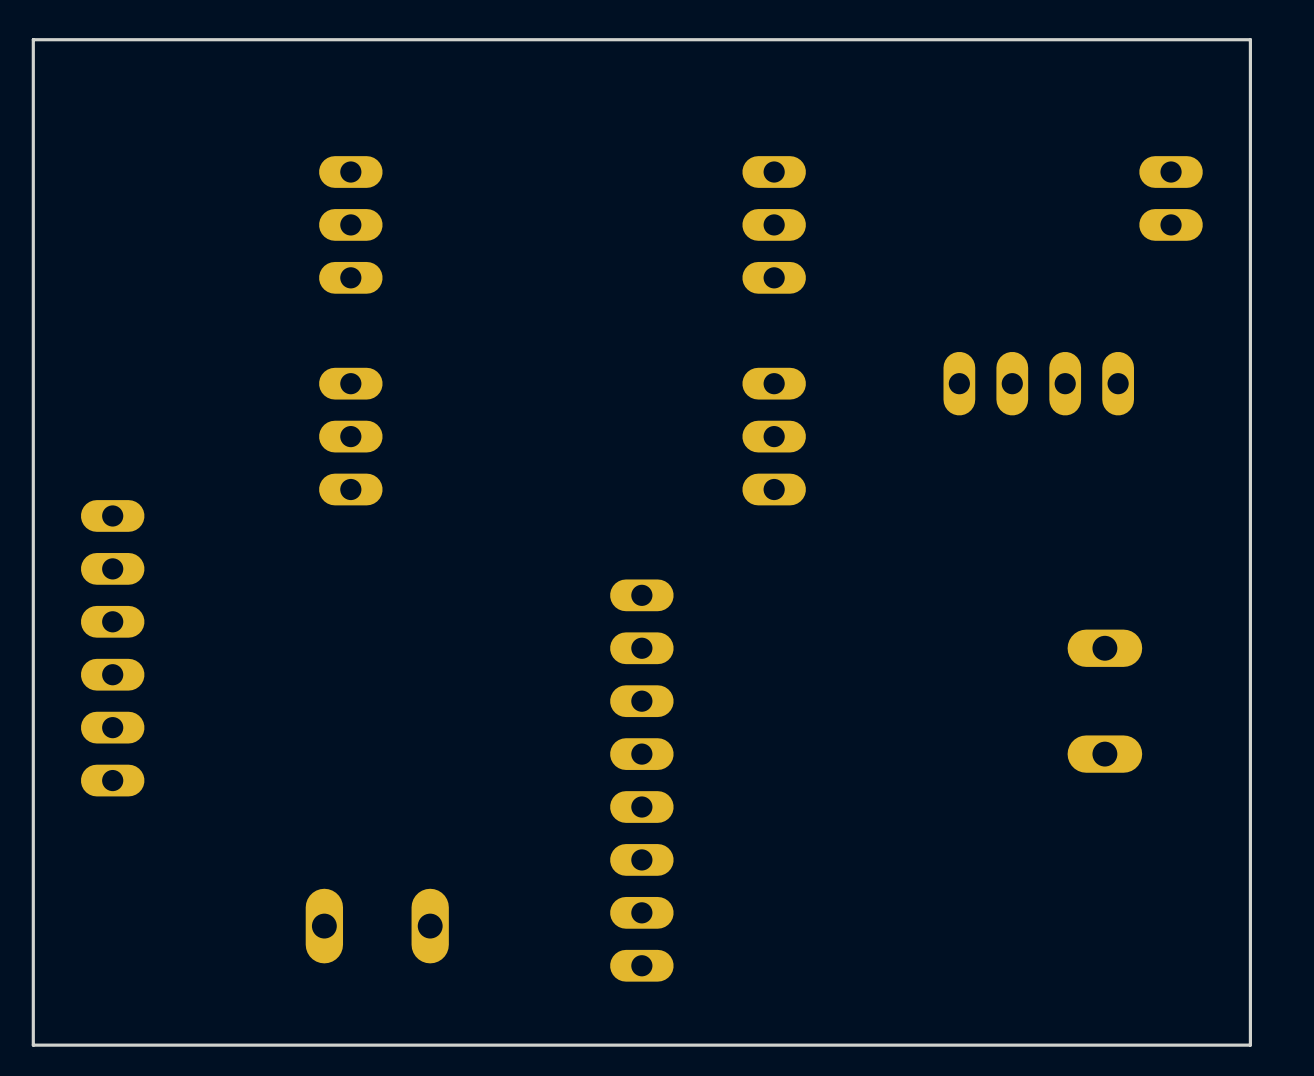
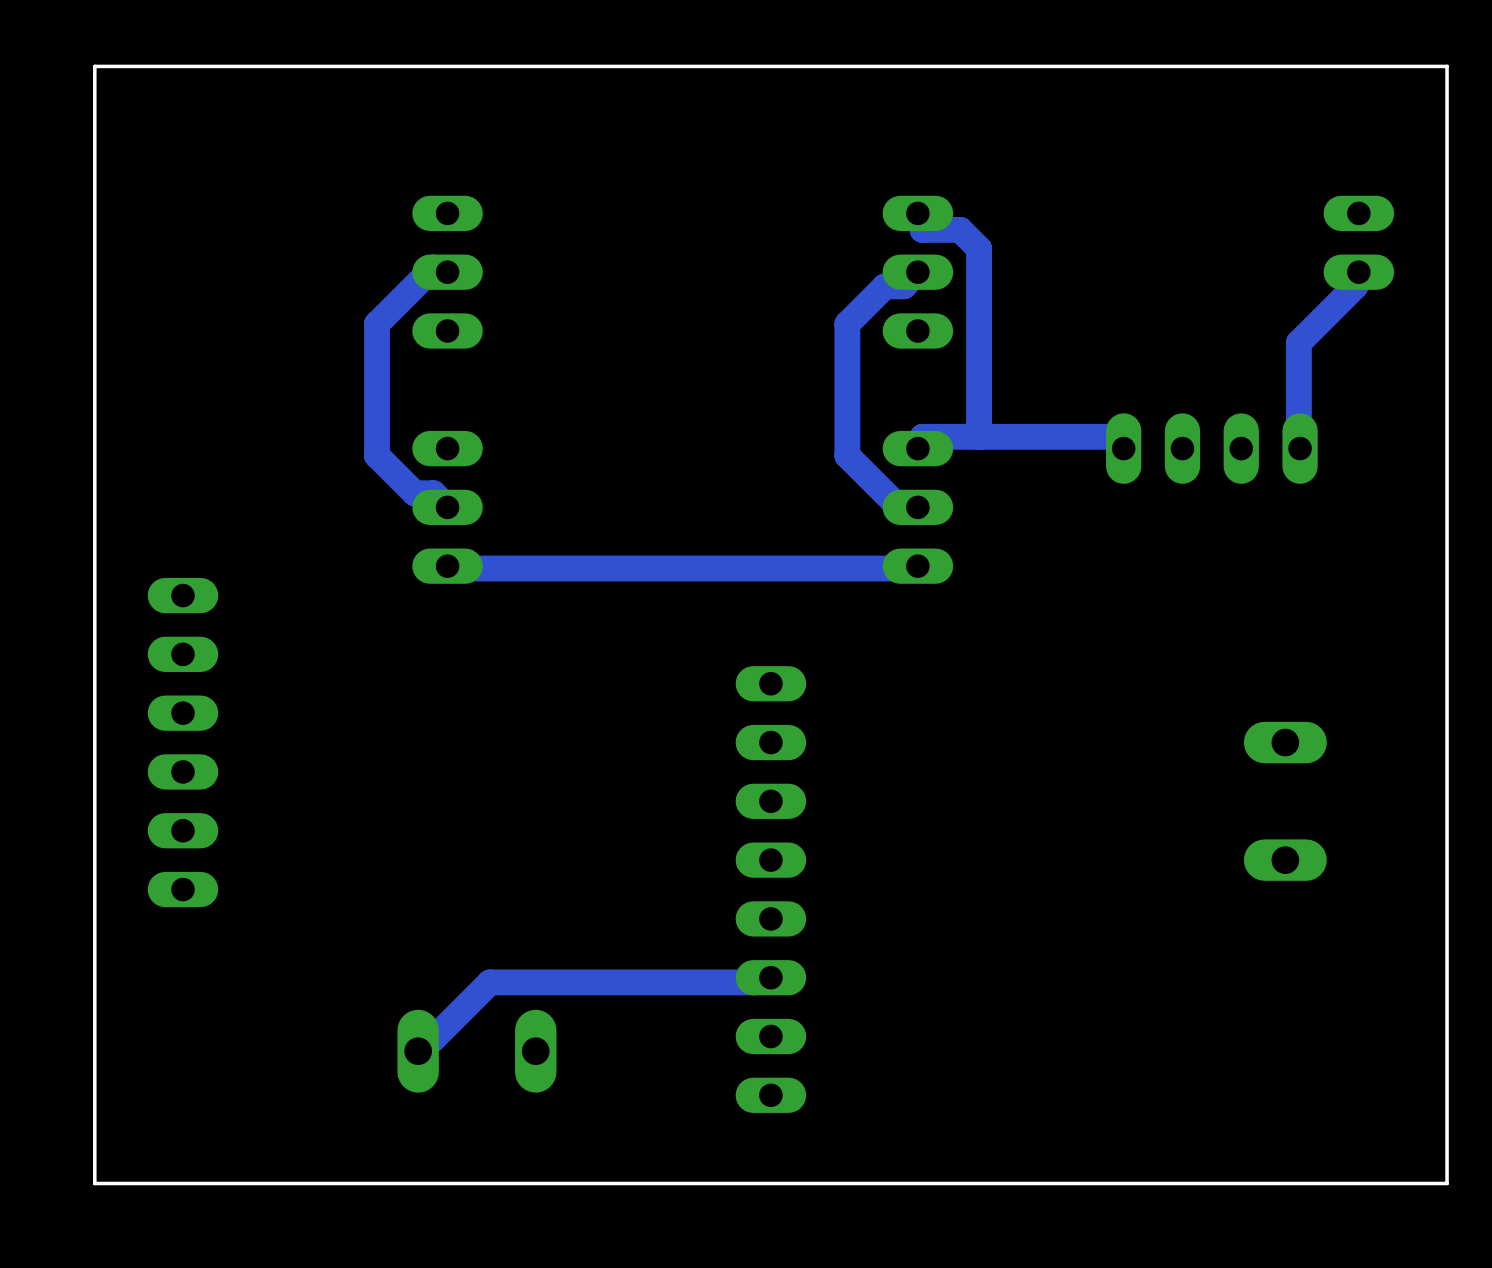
track: none -> (917, 213) (922, 229) (960, 229) (979, 248) (979, 436)
track: none -> (447, 272) (433, 267) (377, 323) (377, 455) (414, 493) (433, 493) (447, 507)
track: none -> (917, 272) (903, 286) (884, 286) (847, 323) (847, 455) (903, 512) (917, 507)
track: none -> (1358, 272) (1355, 286) (1298, 342) (1300, 448)
track: none -> (1123, 448) (1110, 436) (922, 436) (917, 448)
track: none -> (917, 566) (903, 568) (452, 568) (447, 566)
track: none -> (770, 977) (753, 982) (489, 982) (433, 1038) (418, 1051)

